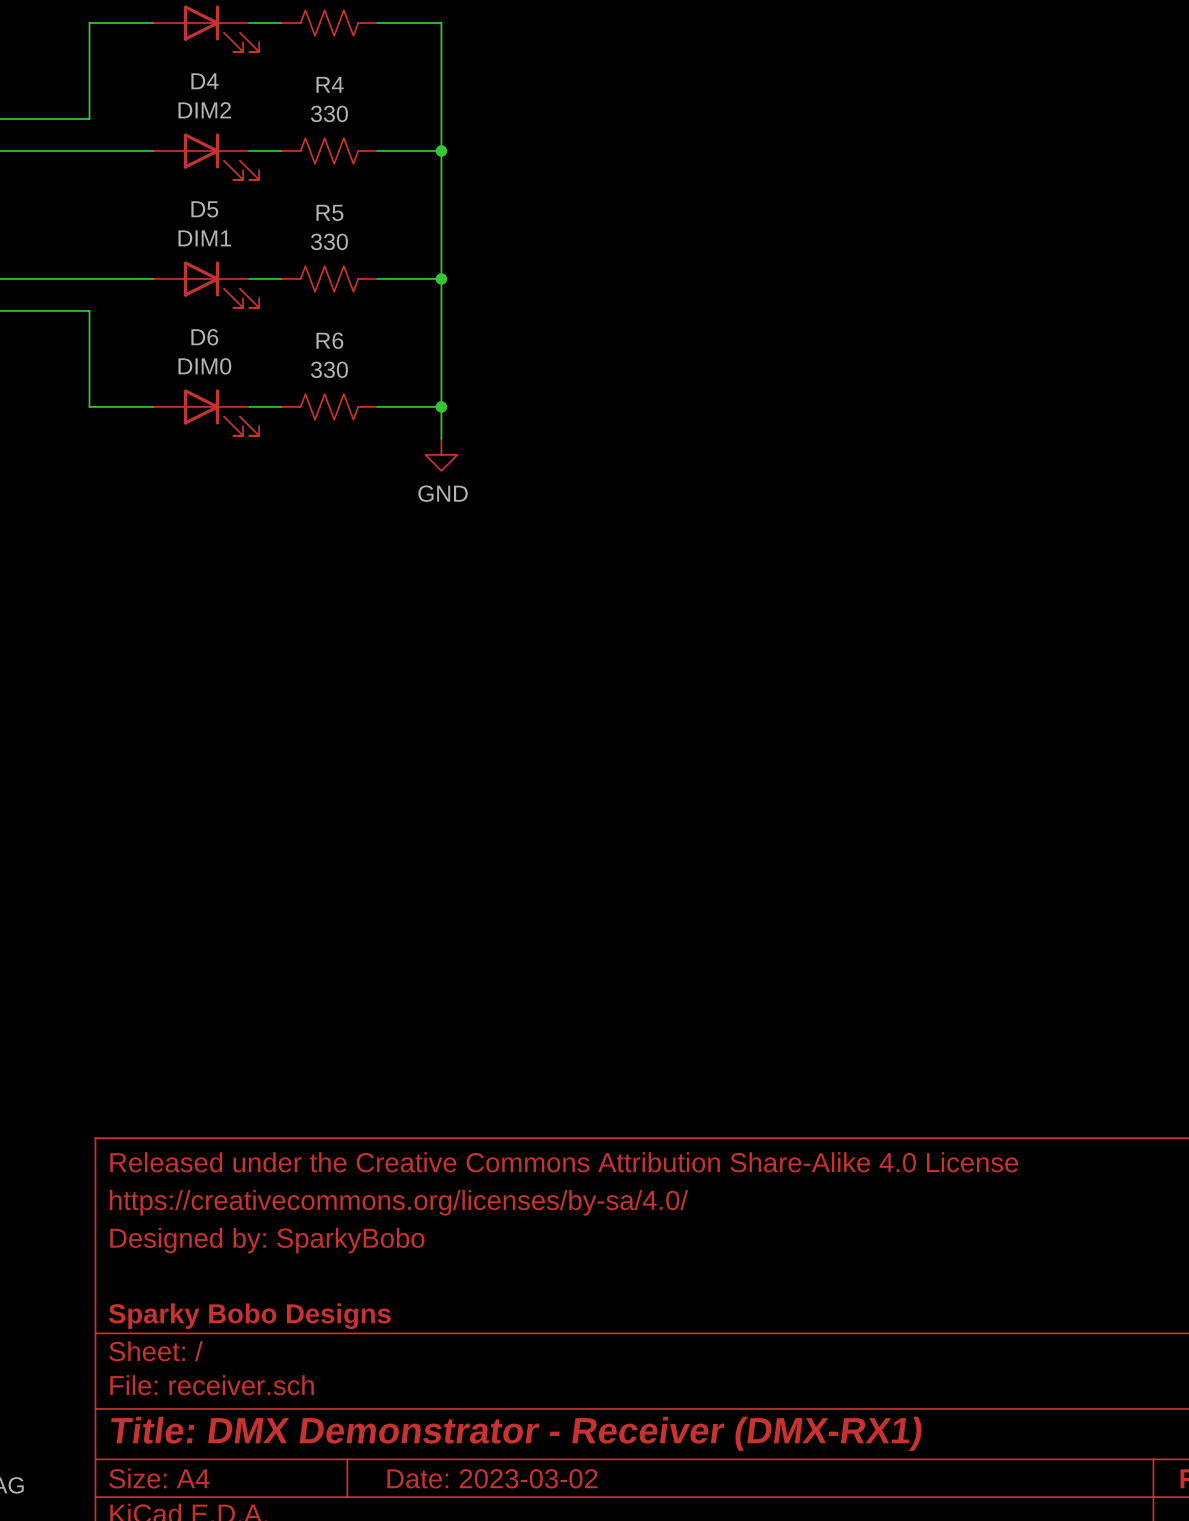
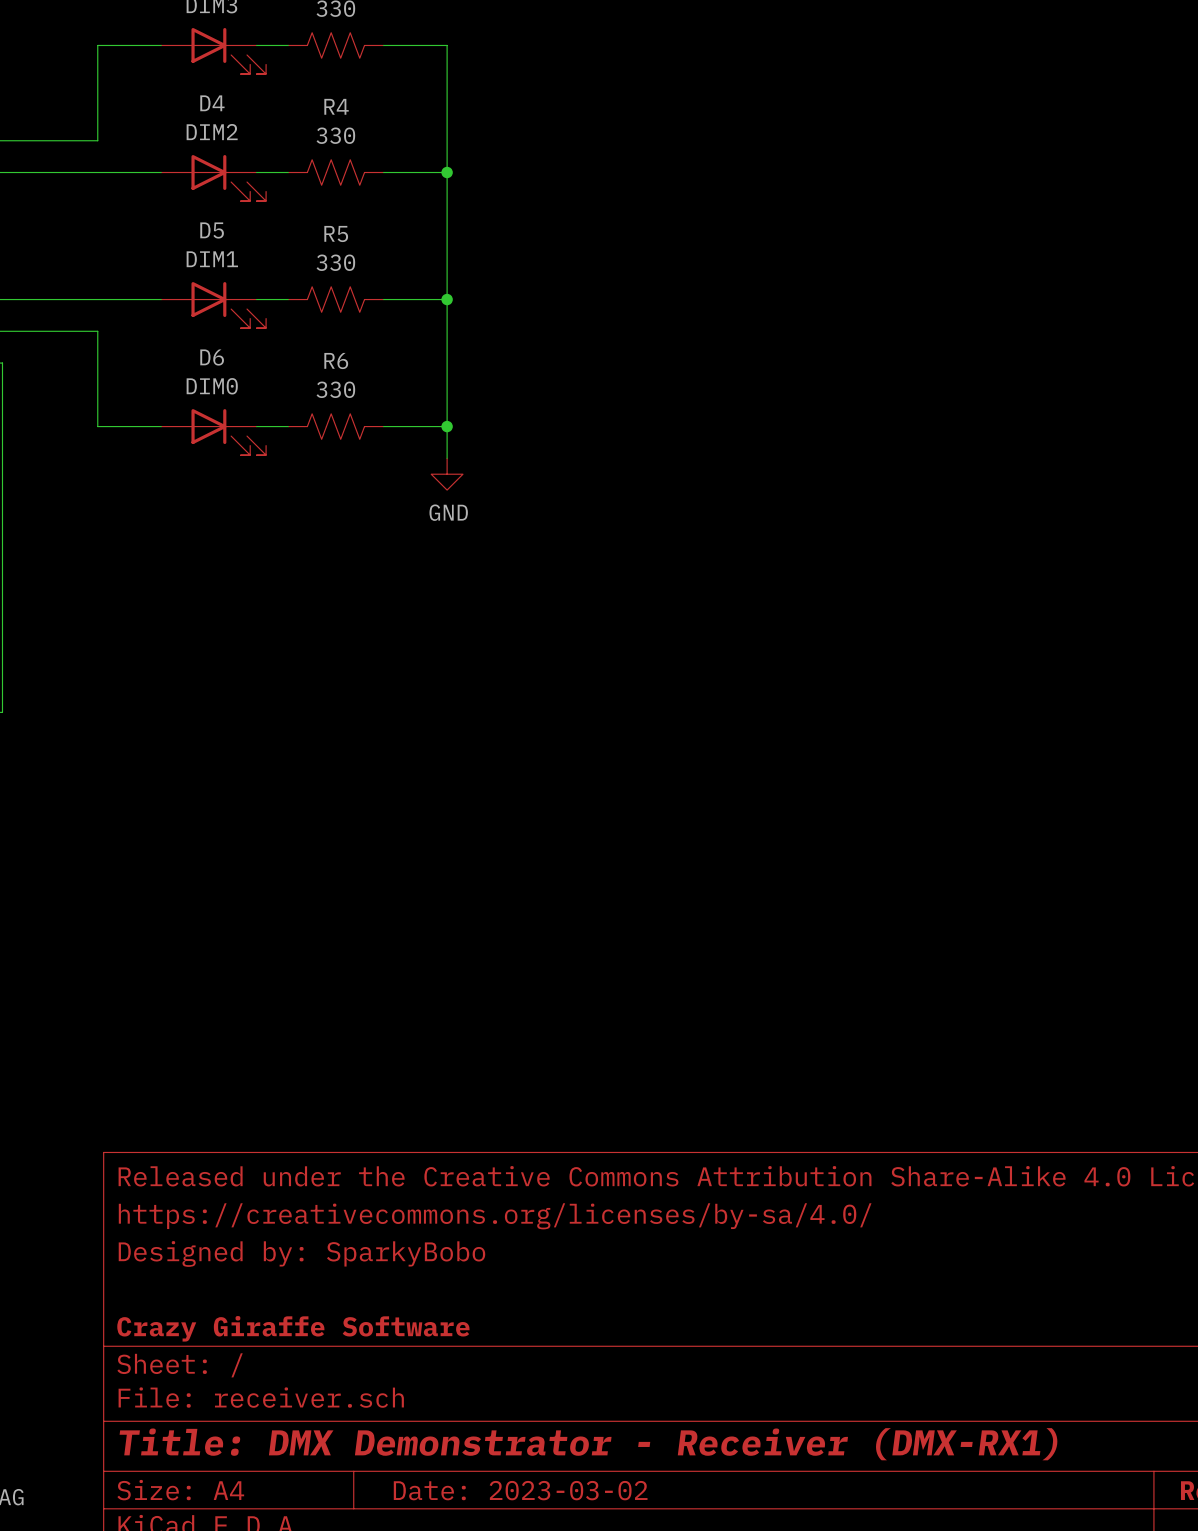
title block: Sparky Bobo Designs (249, 1316) -> Crazy Giraffe Software (293, 1328)

